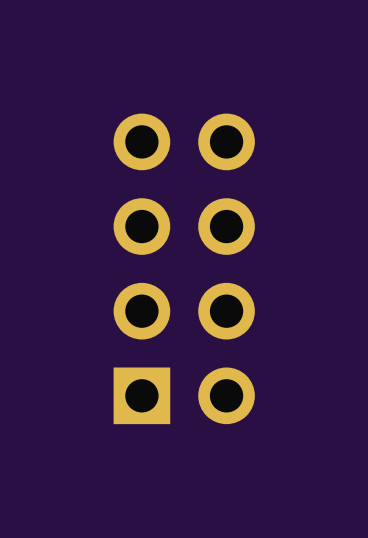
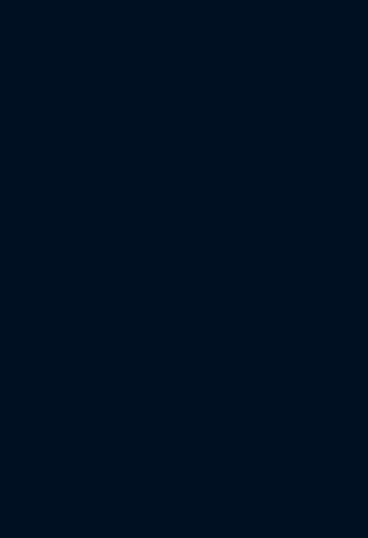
part: (184, 268) -> none

